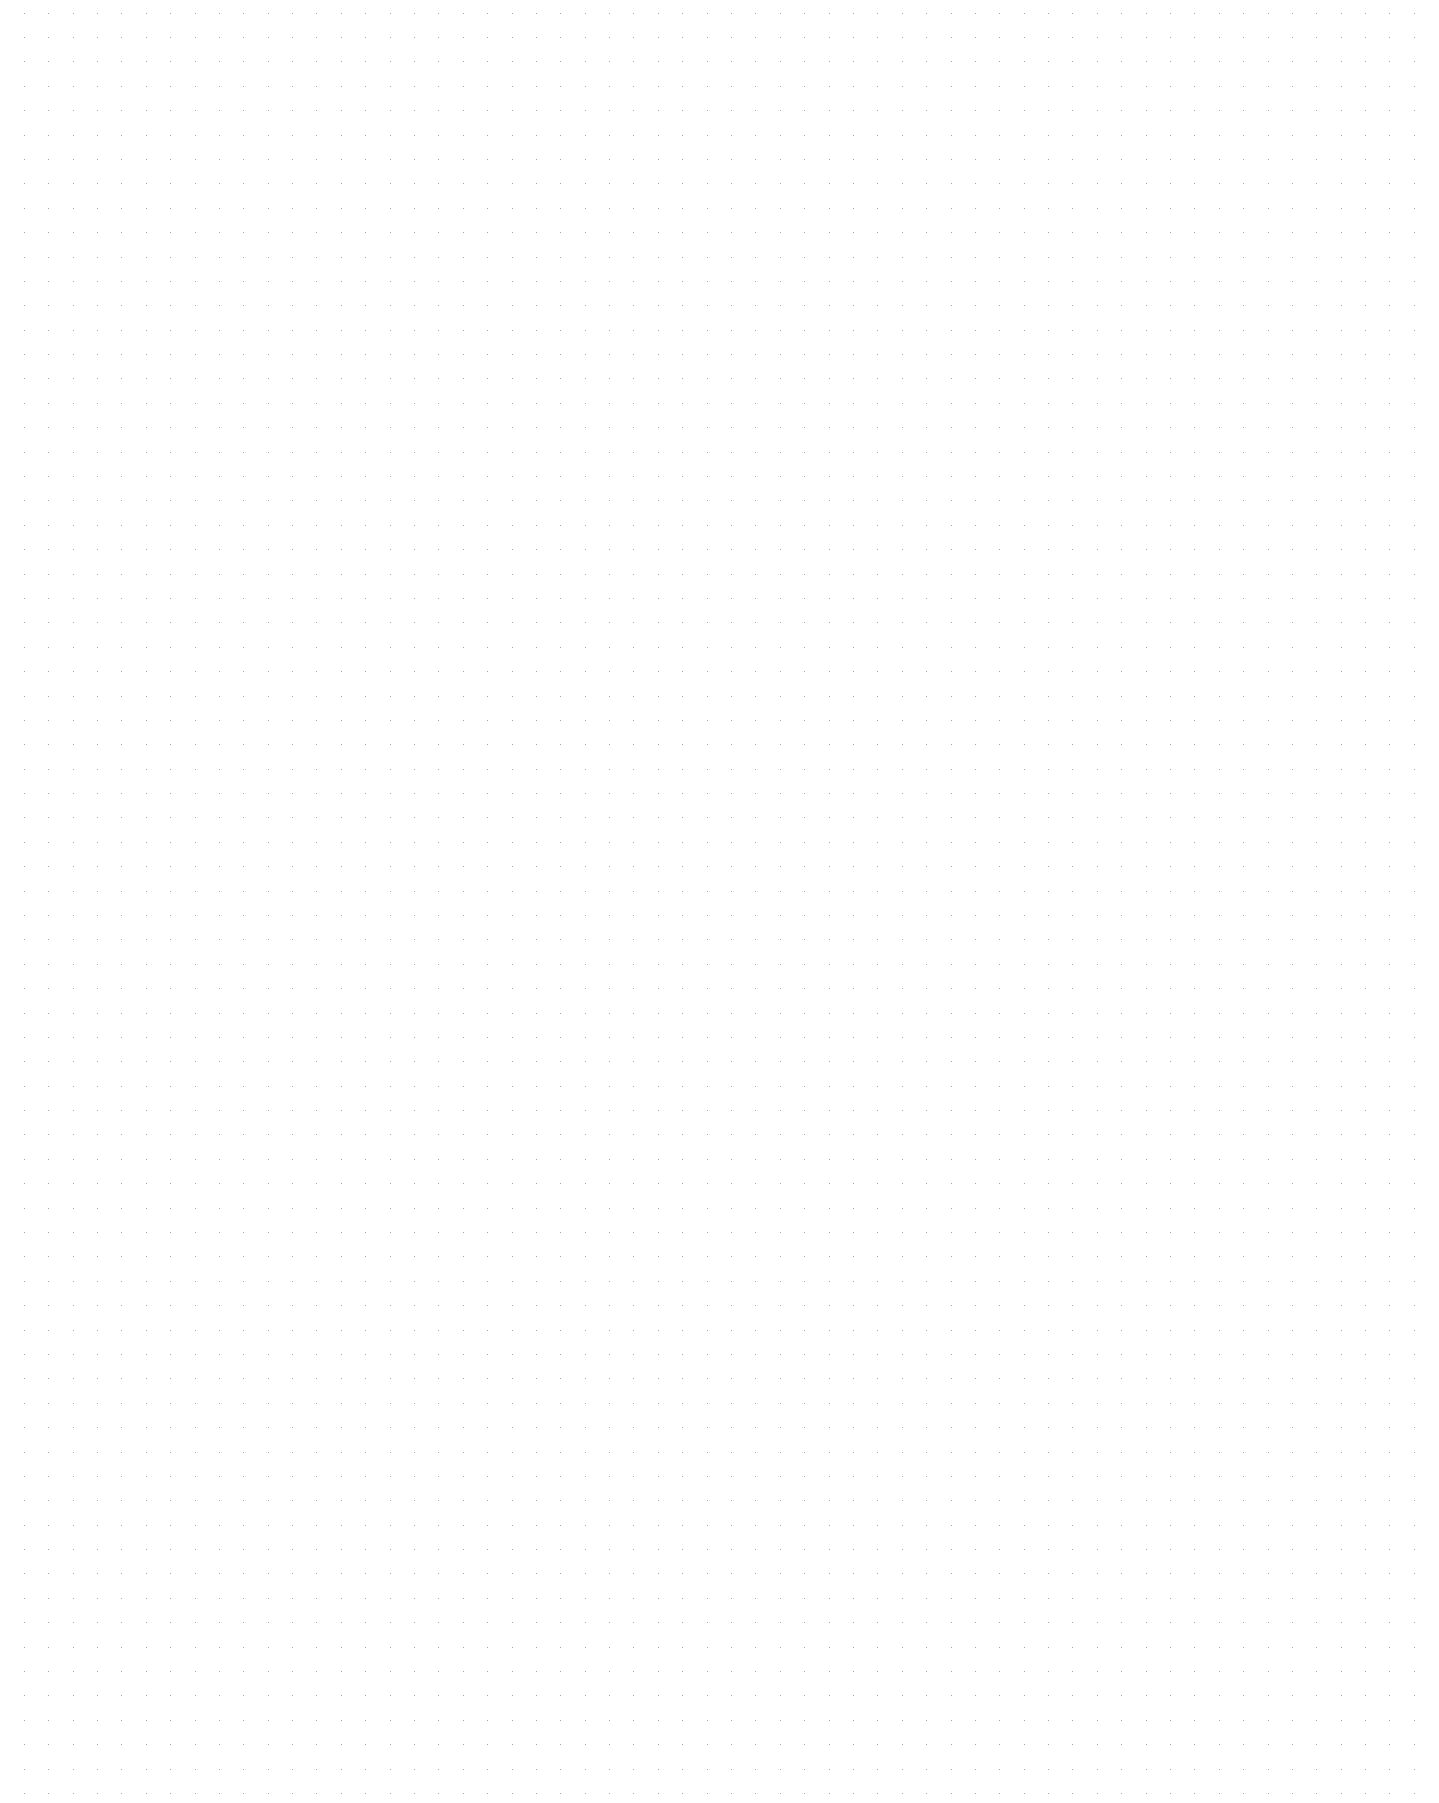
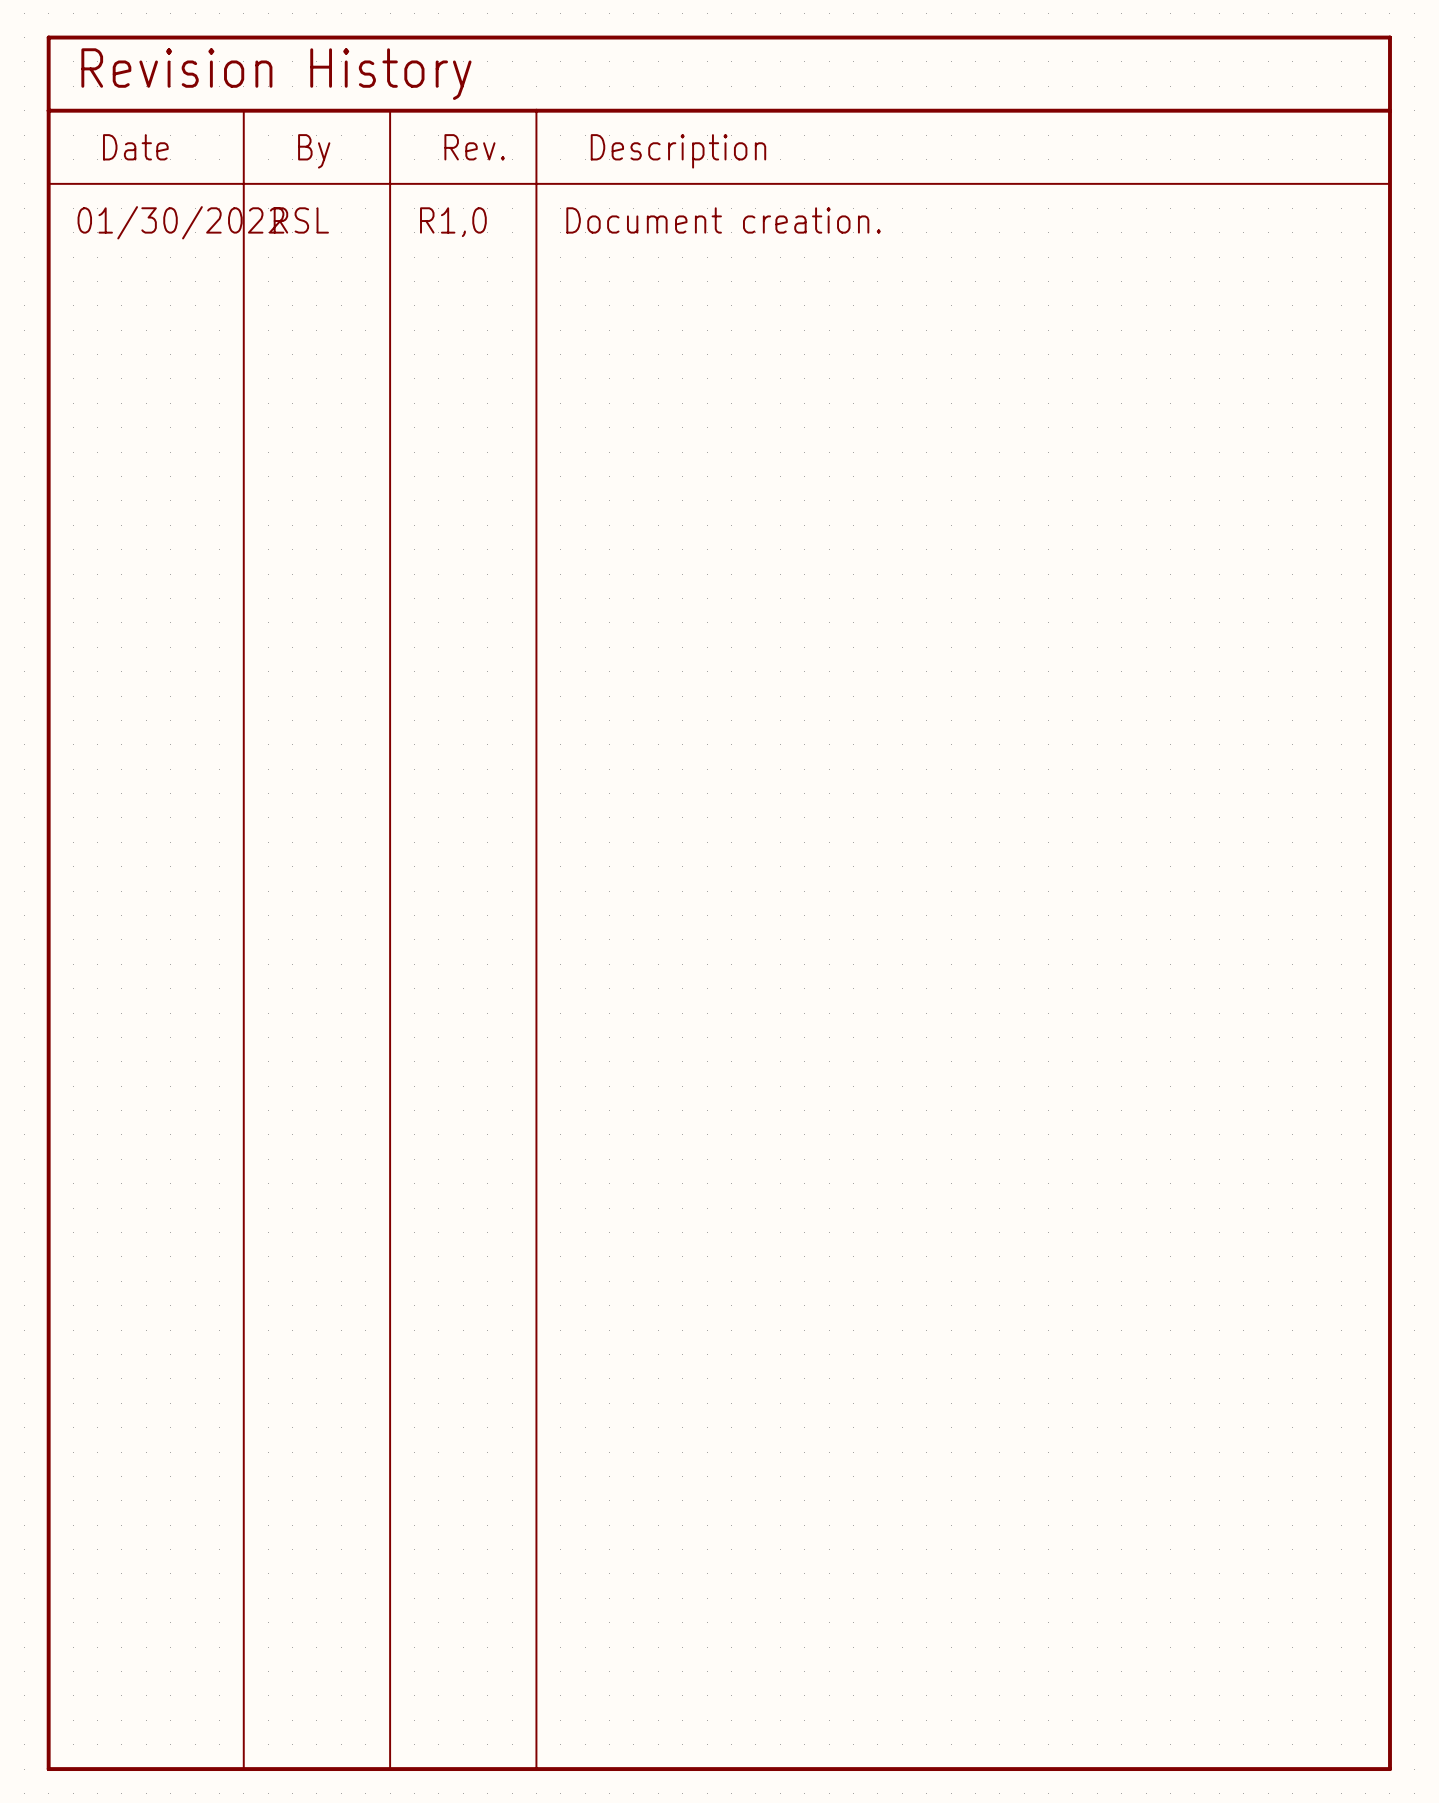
text: none -> RSL (301, 220)
text: none -> Document creation. (723, 220)
text: none -> 01/30/2022 (180, 222)
text: none -> R1,0 (453, 222)
part: none -> (719, 903)

